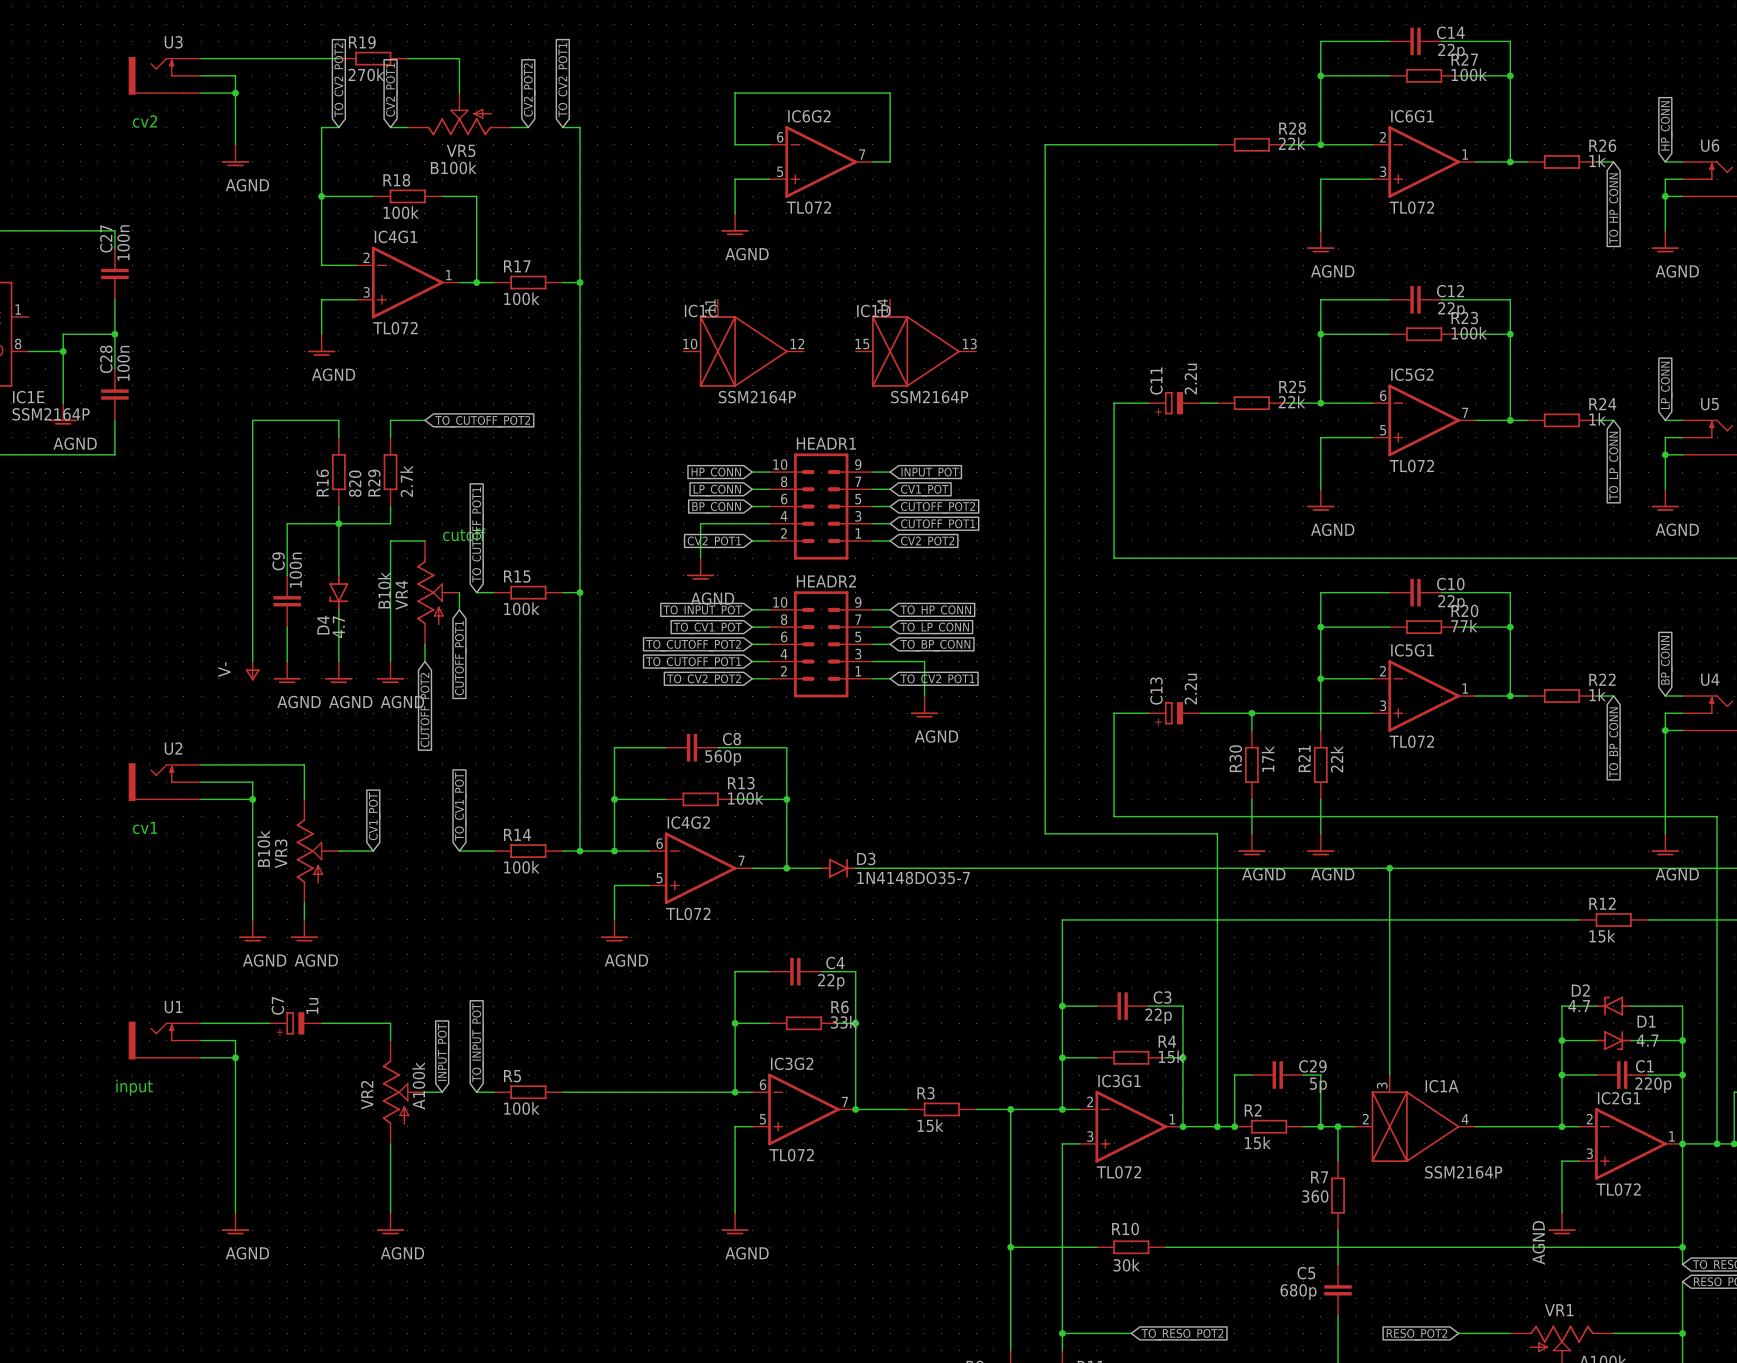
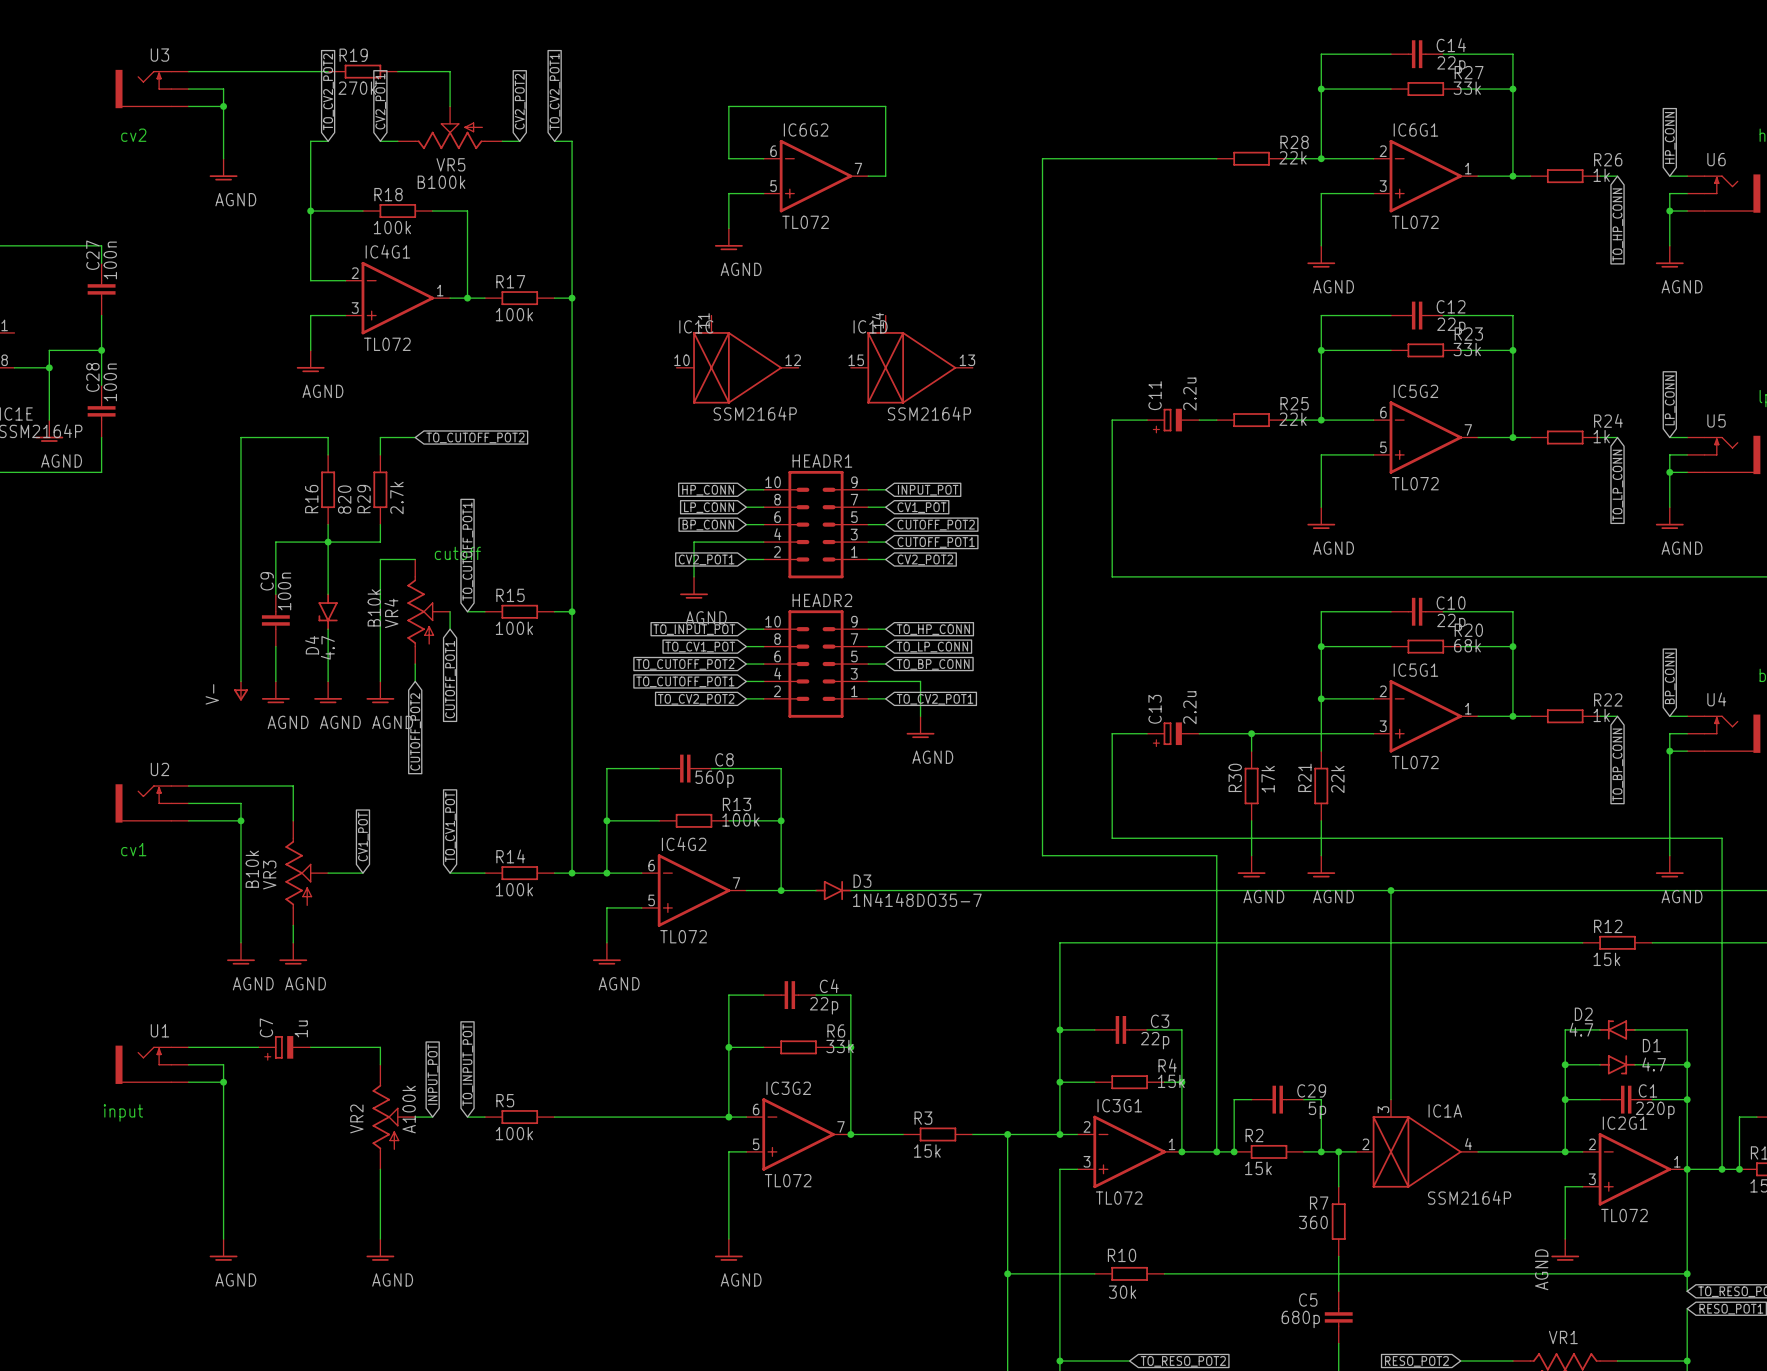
R27 value: 100k (1469, 74) -> 33k (1467, 88)
R23 value: 100k (1469, 333) -> 33k (1467, 349)
R20 value: 77k (1464, 625) -> 68k (1467, 645)

